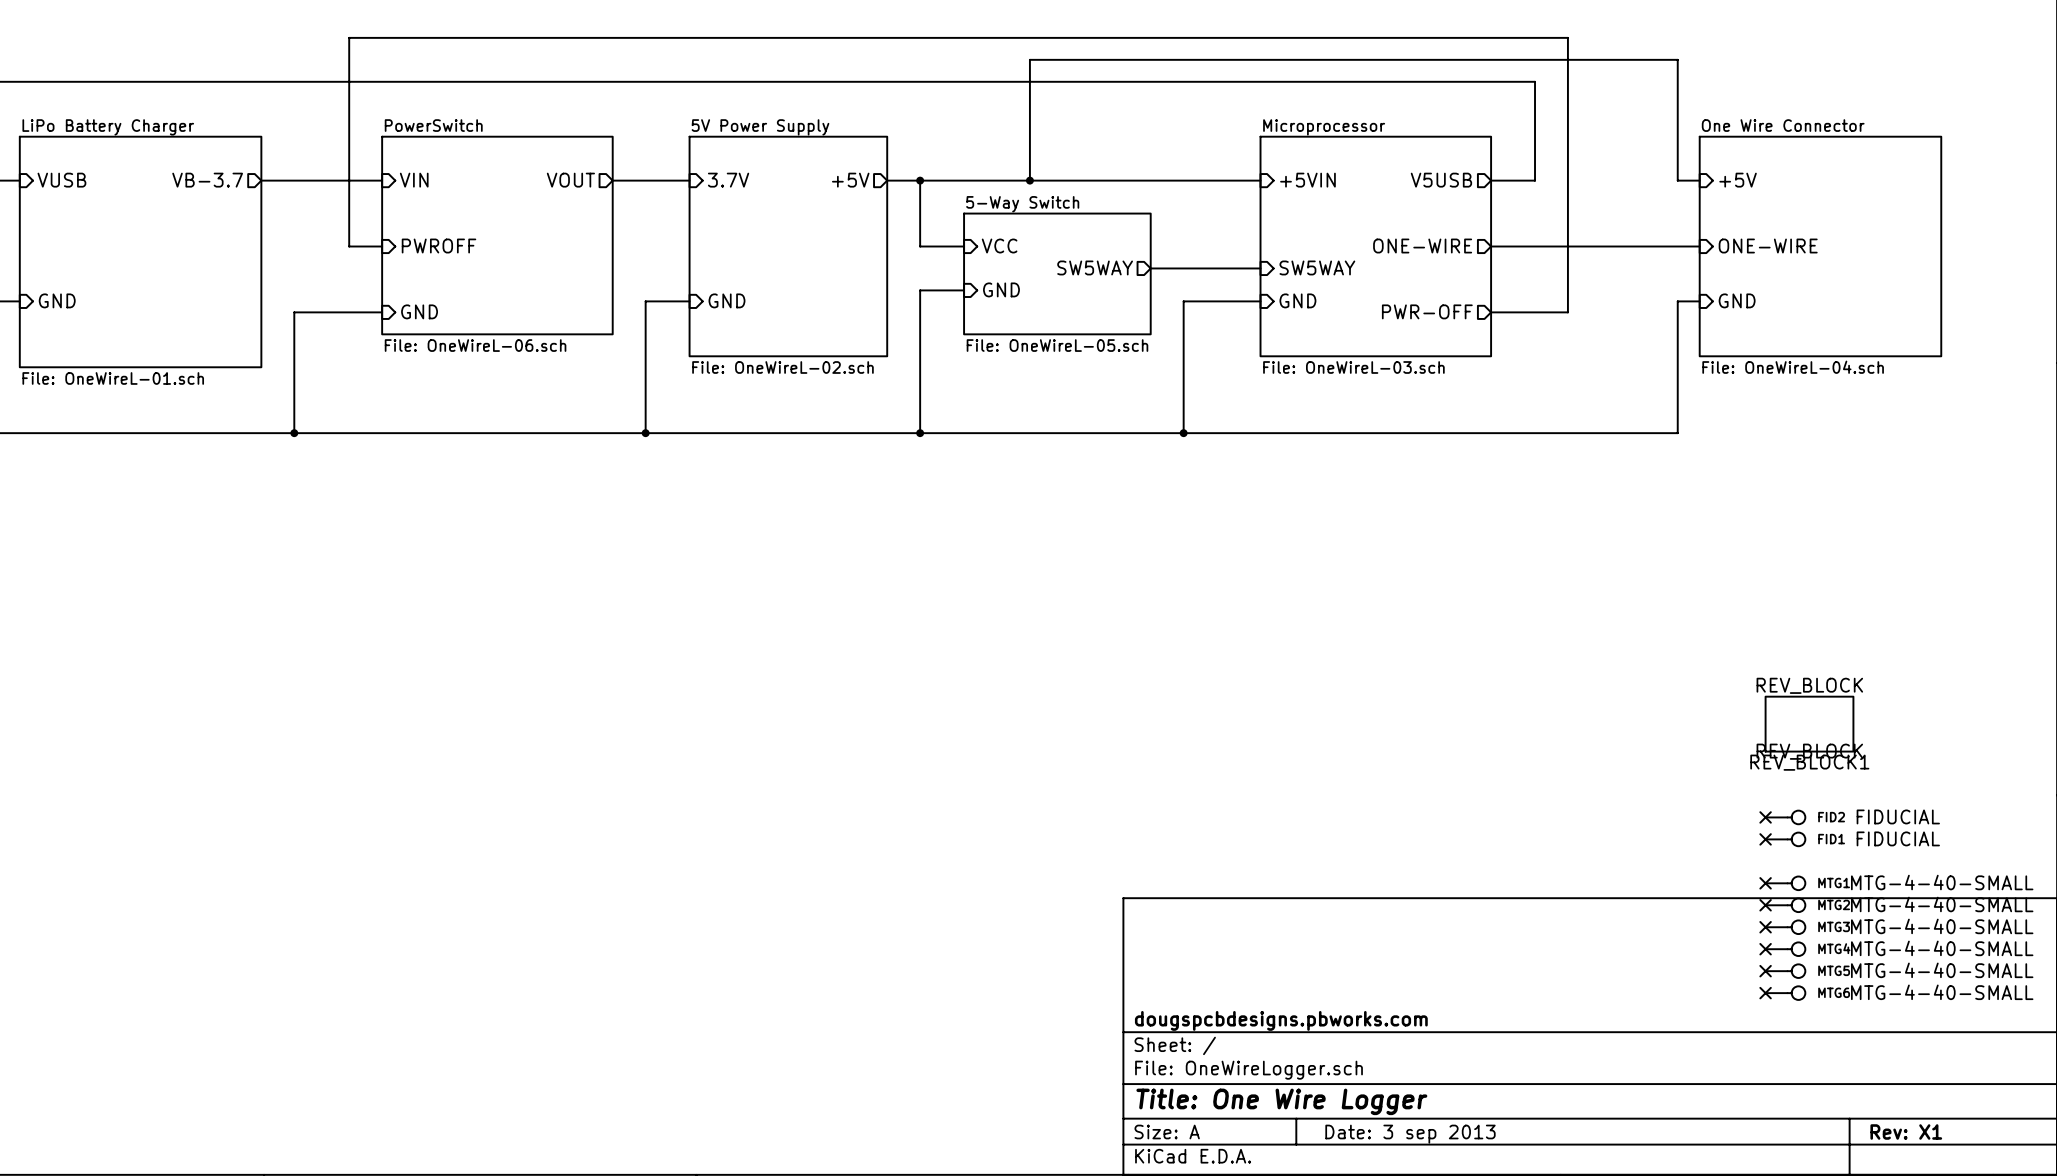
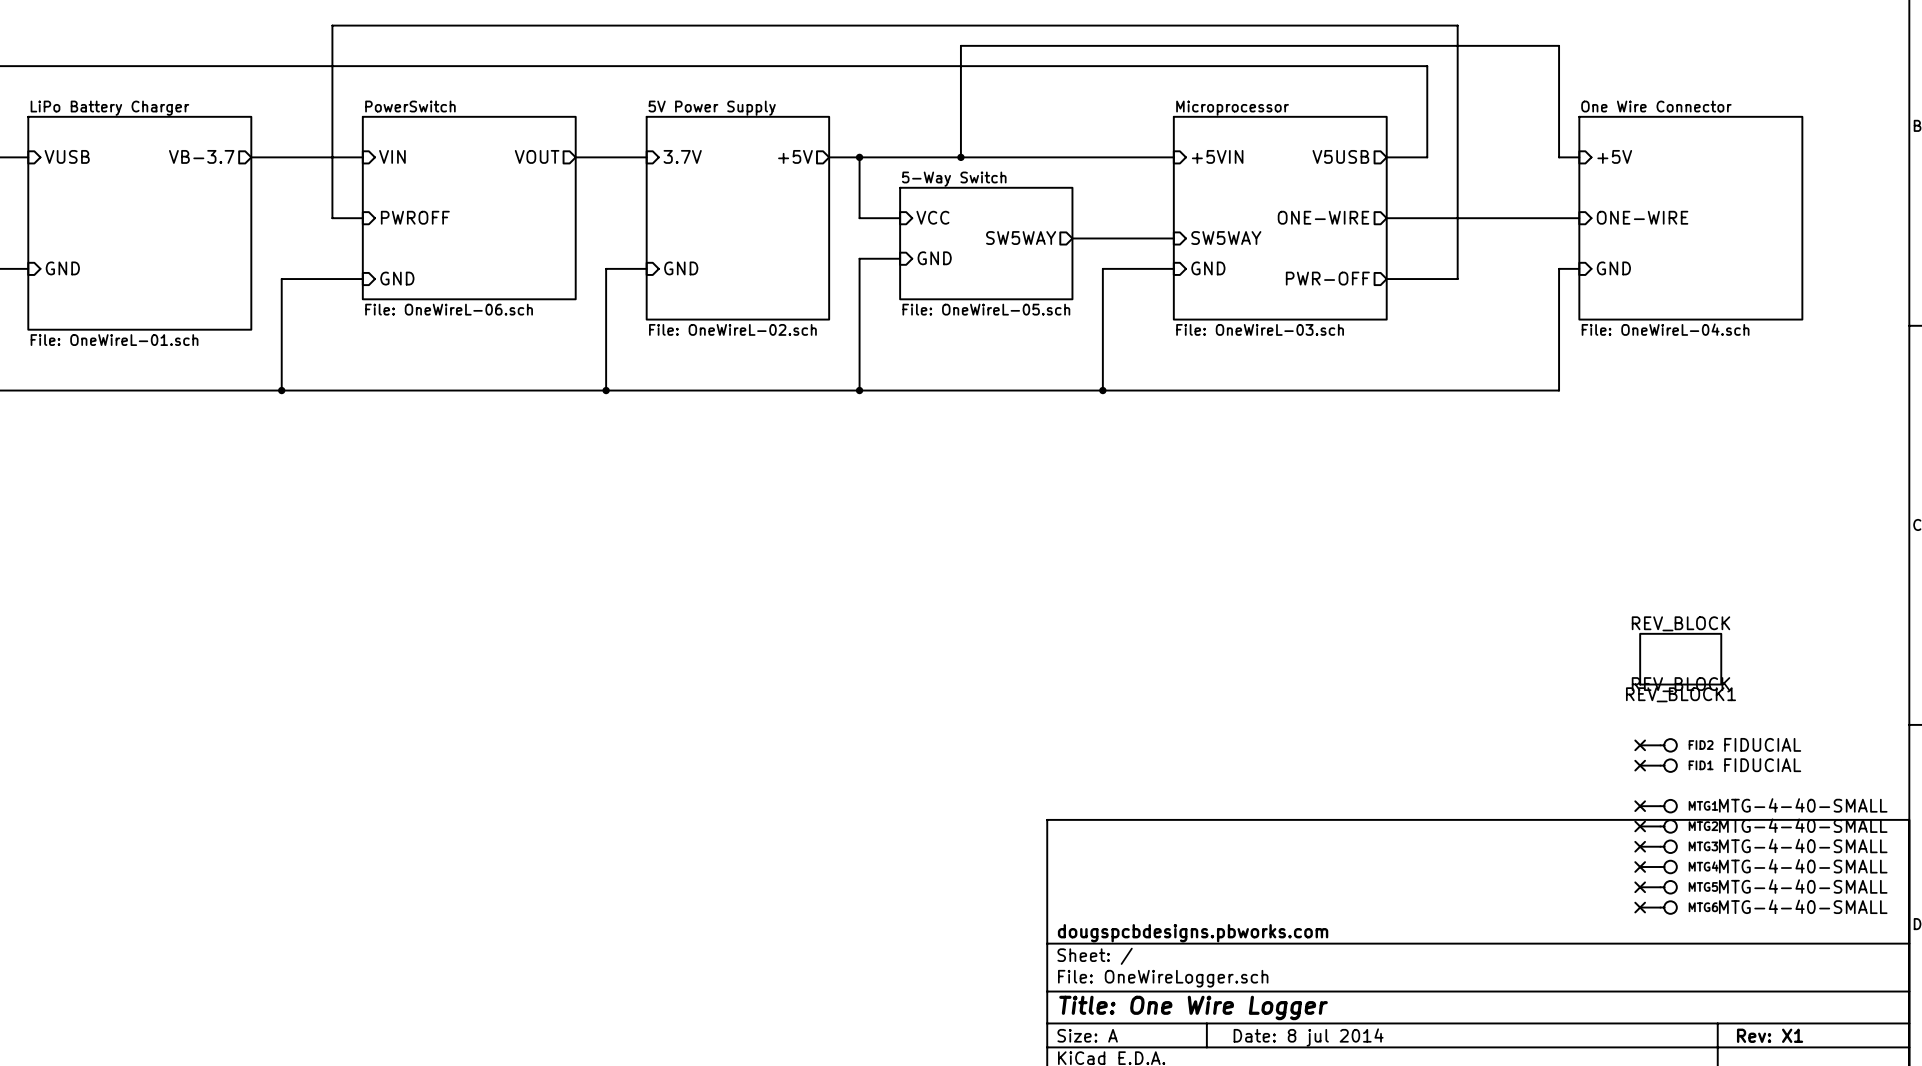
title block: Date: 3 sep 2013 (1410, 1134) -> Date: 8 jul 2014 (1308, 1037)

